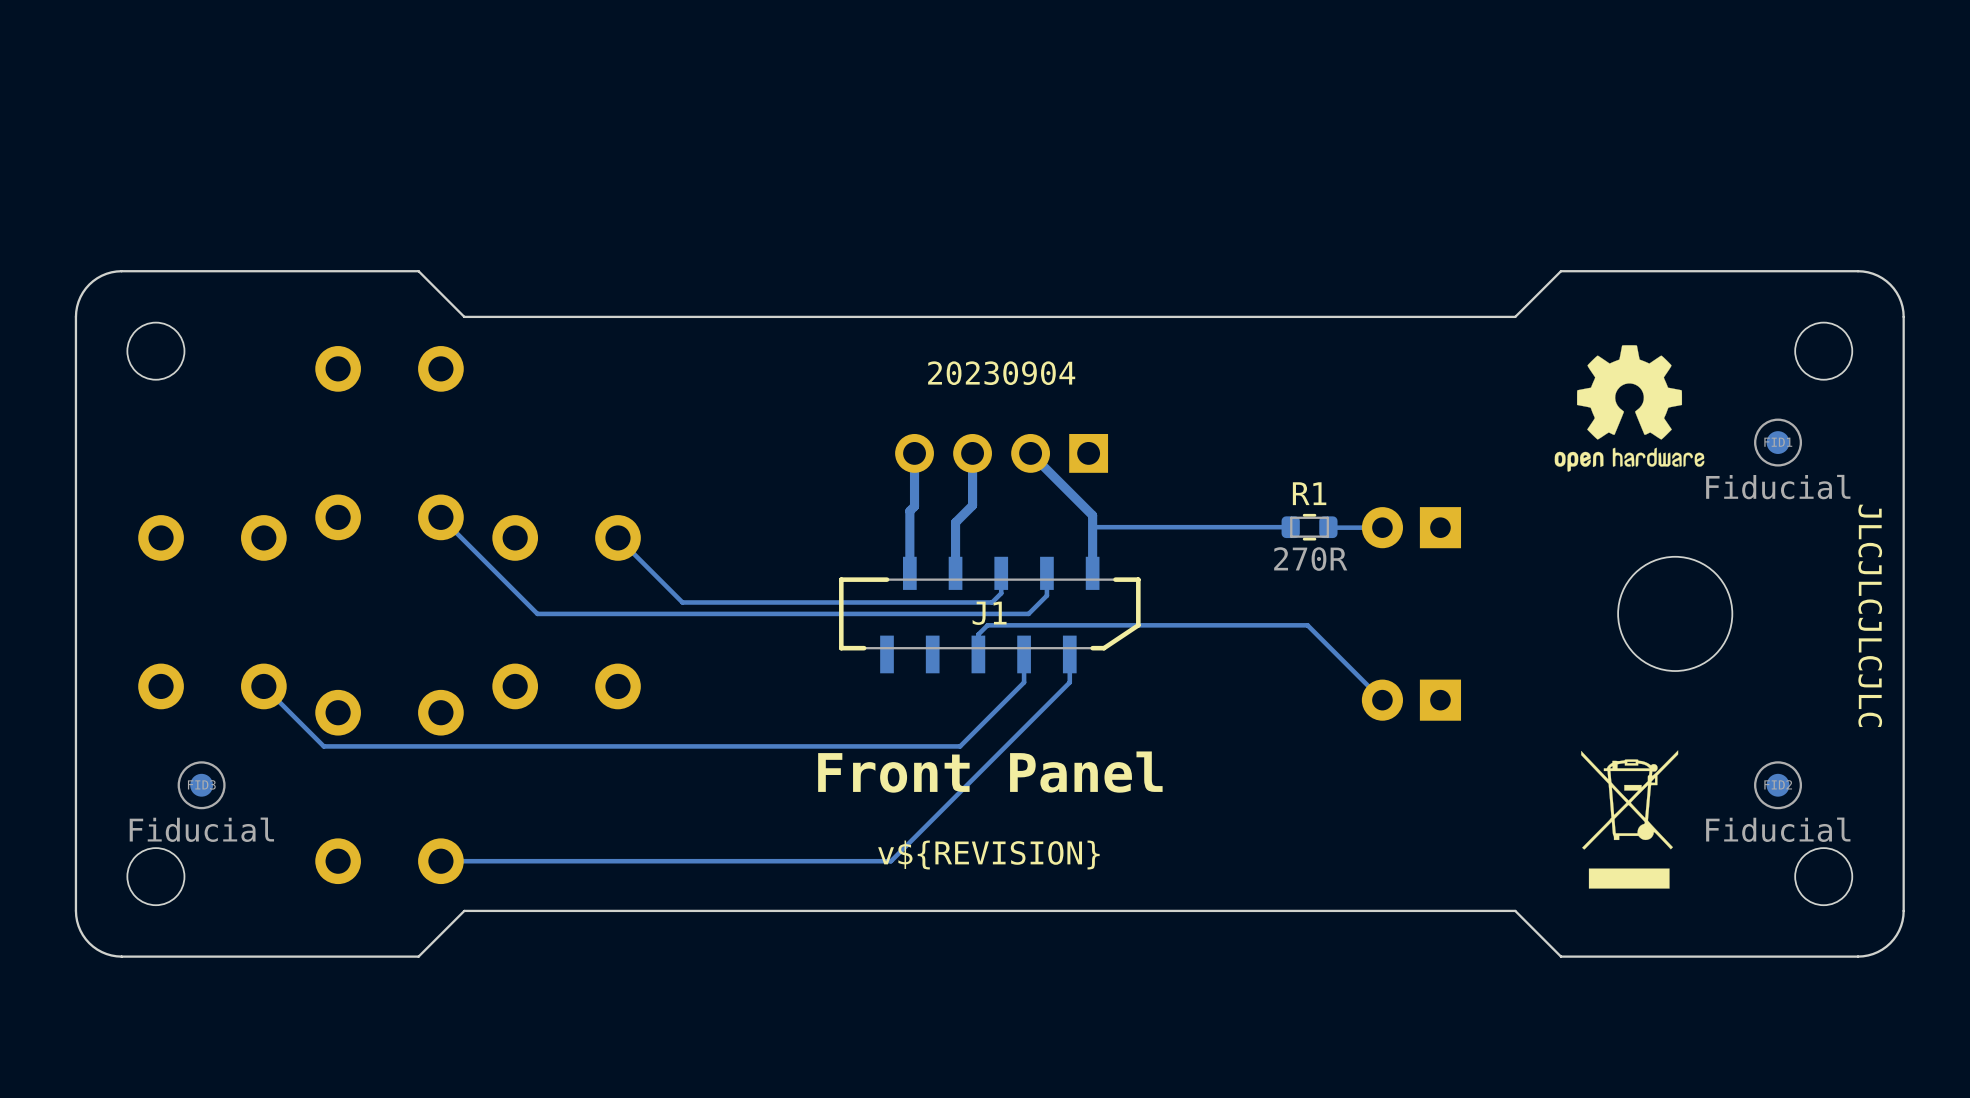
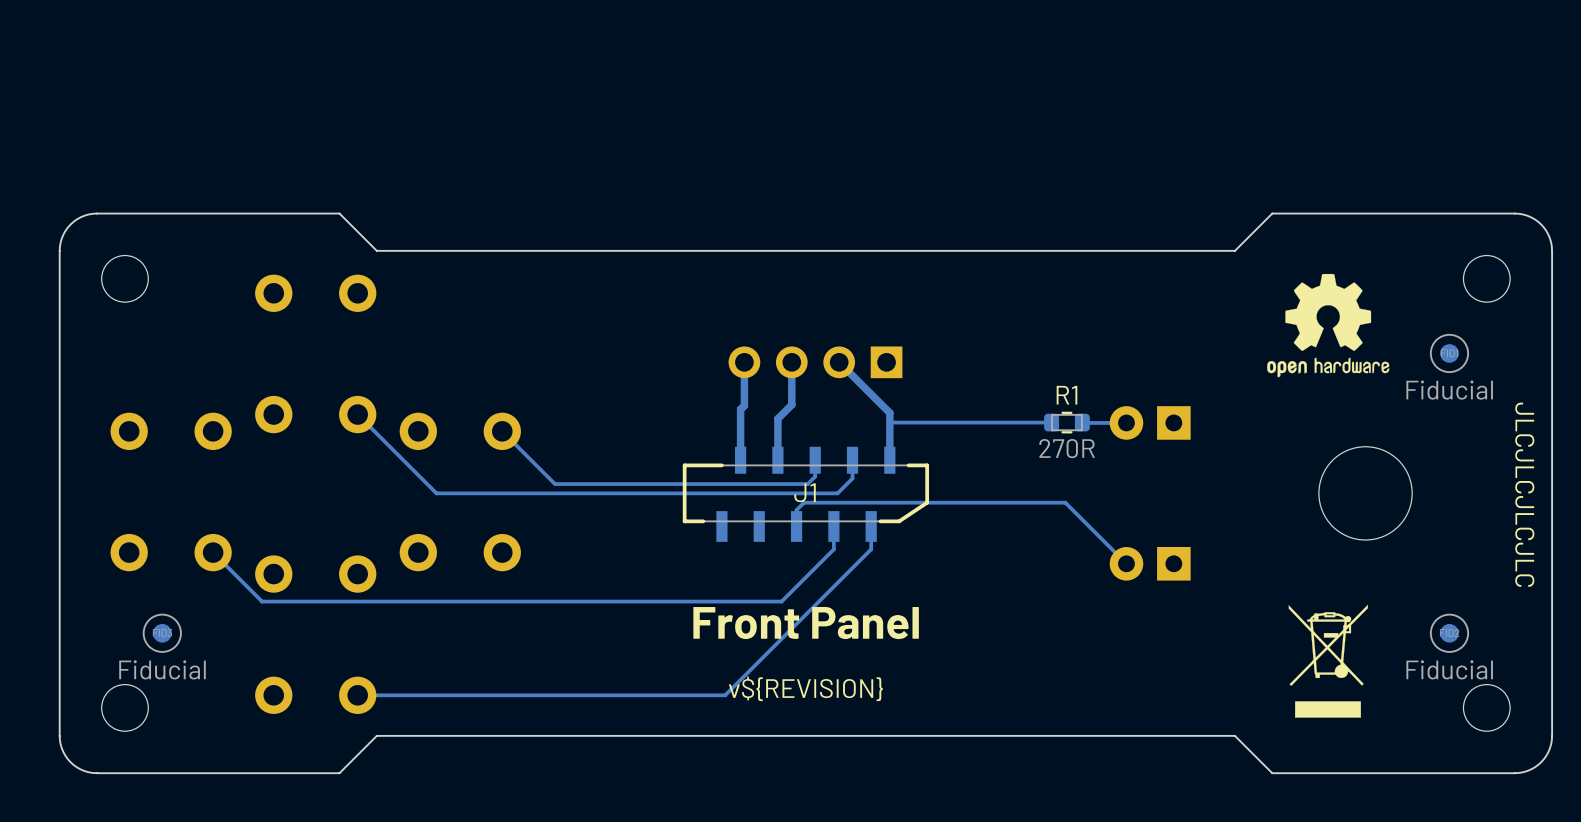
text: 20230904 (1001, 373) -> none
J1 footprint: [839, 556, 1141, 674] -> [682, 446, 930, 542]

